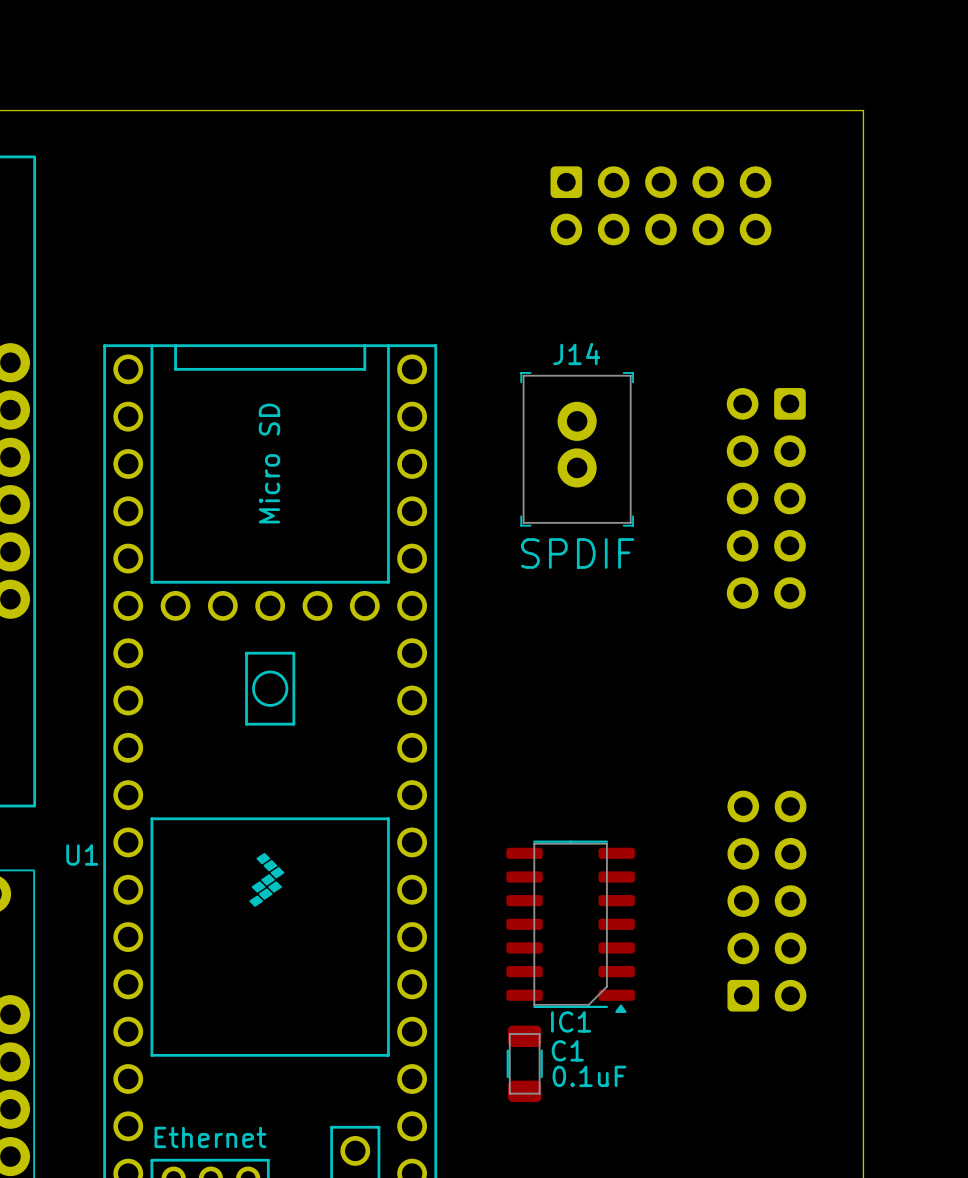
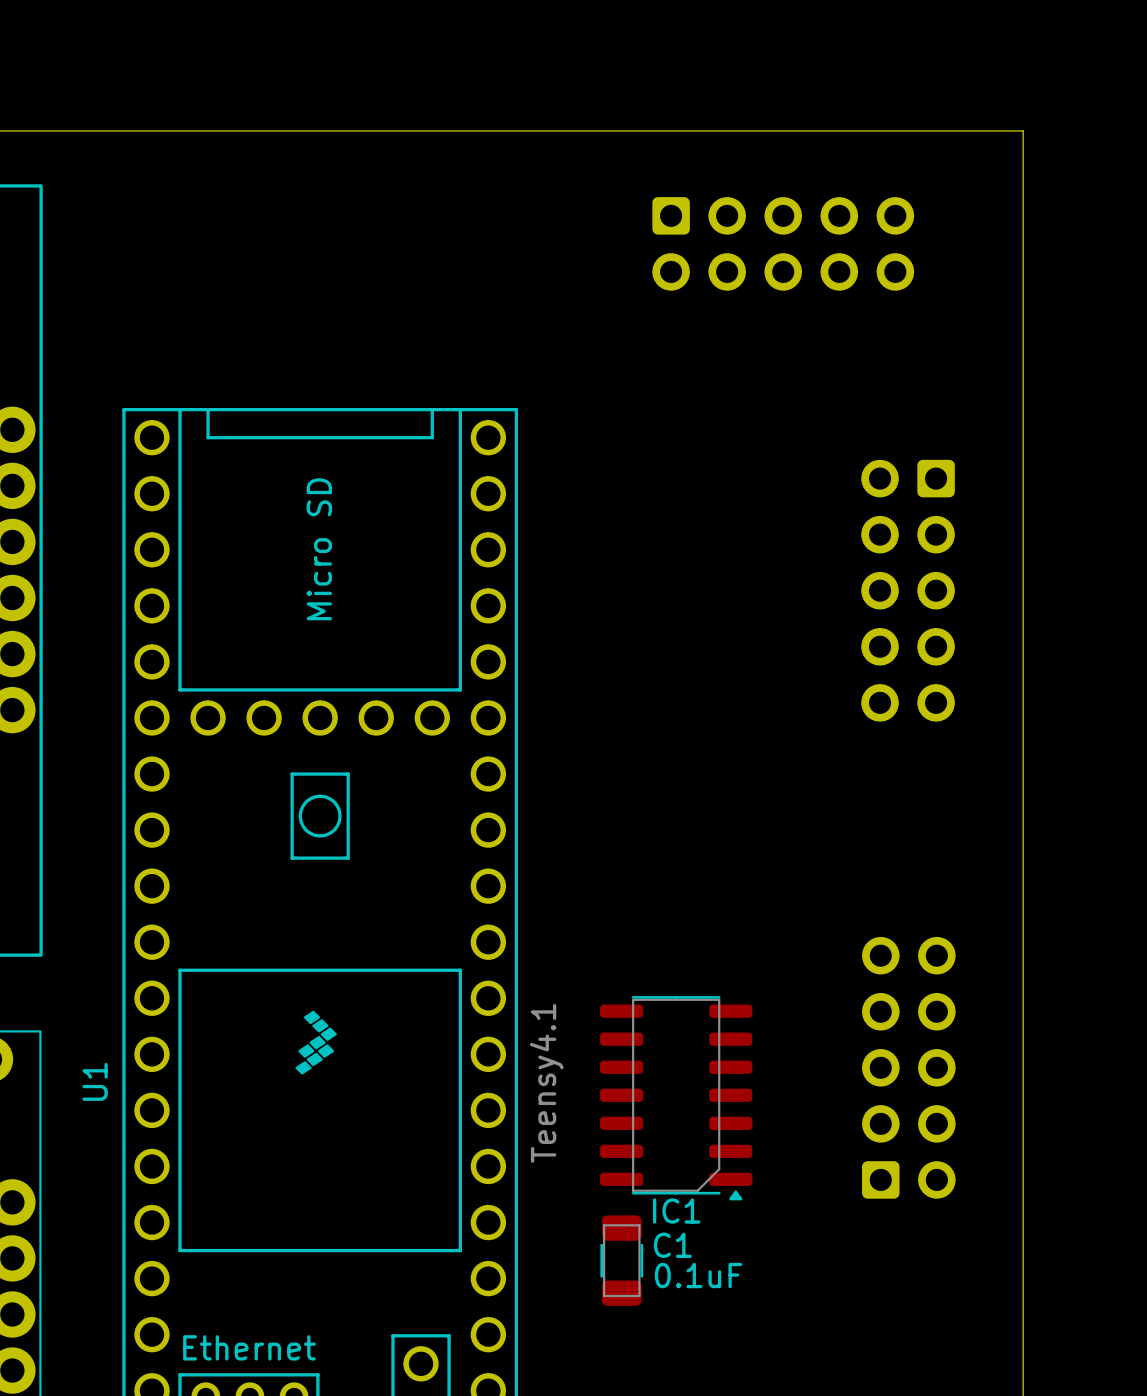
J14: (577, 449) -> none
text: SPDIF (577, 553) -> none
U1 name rotation: 0° (82, 854) -> 90° counterclockwise (95, 1081)
U1 name position: U1 (82, 854) -> U1 (95, 1081)
U1 value: none -> Teensy4.1 (546, 1083)

